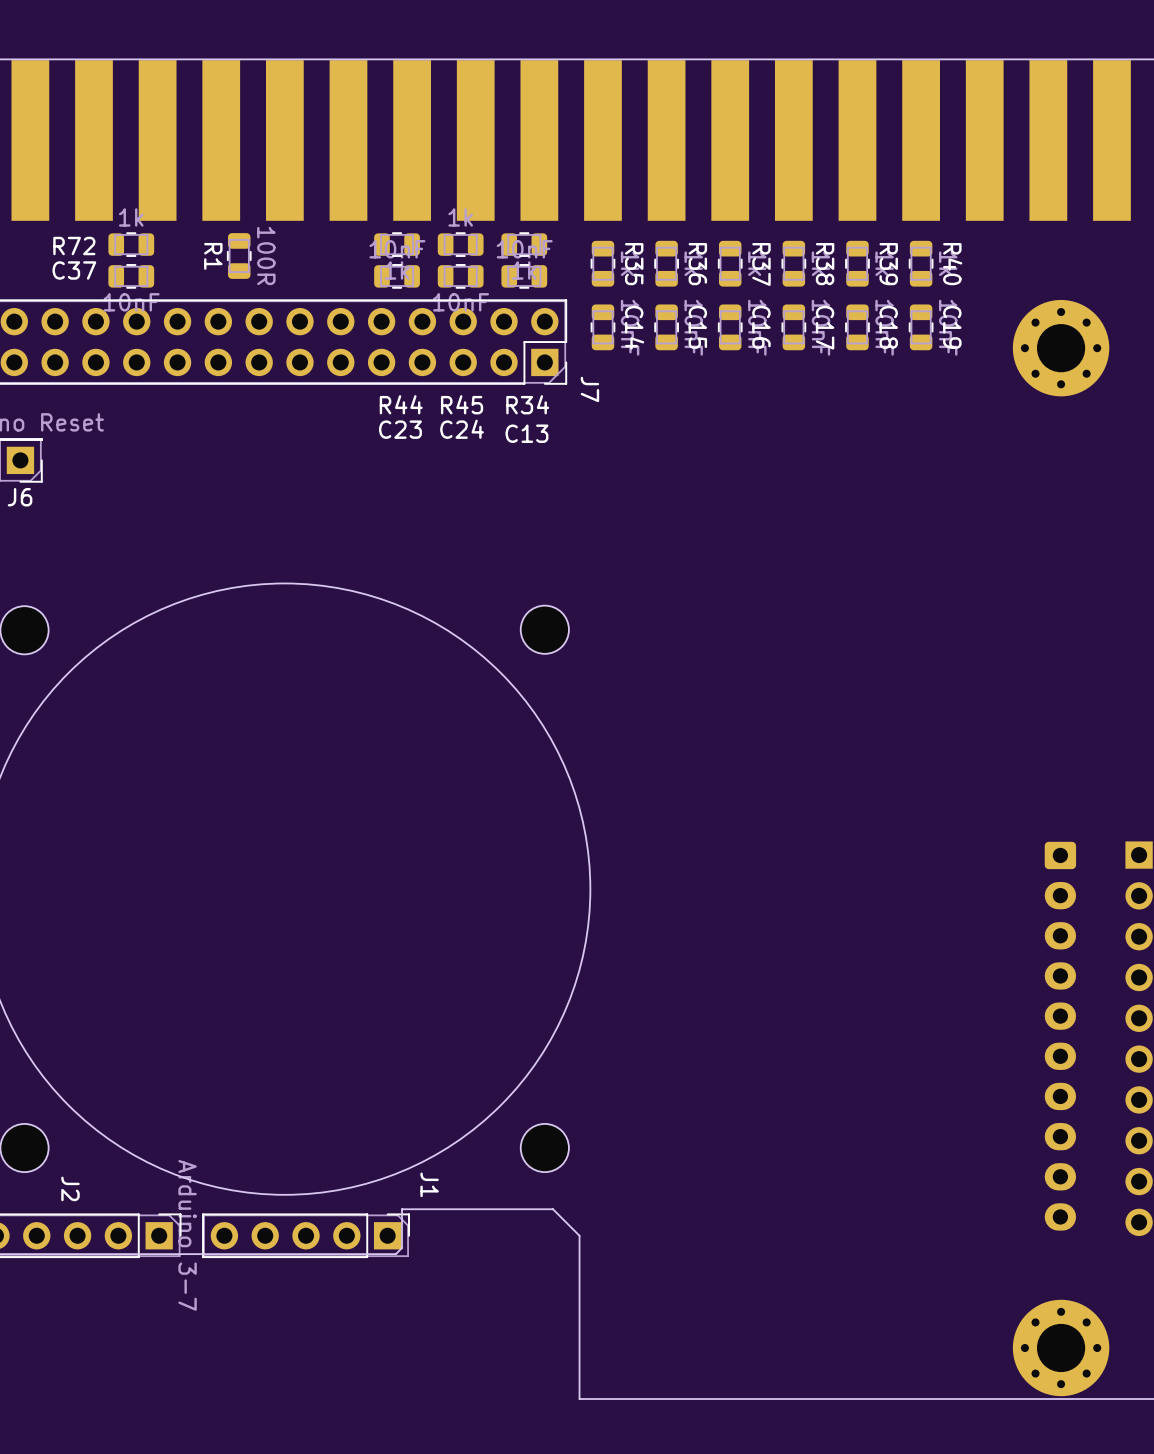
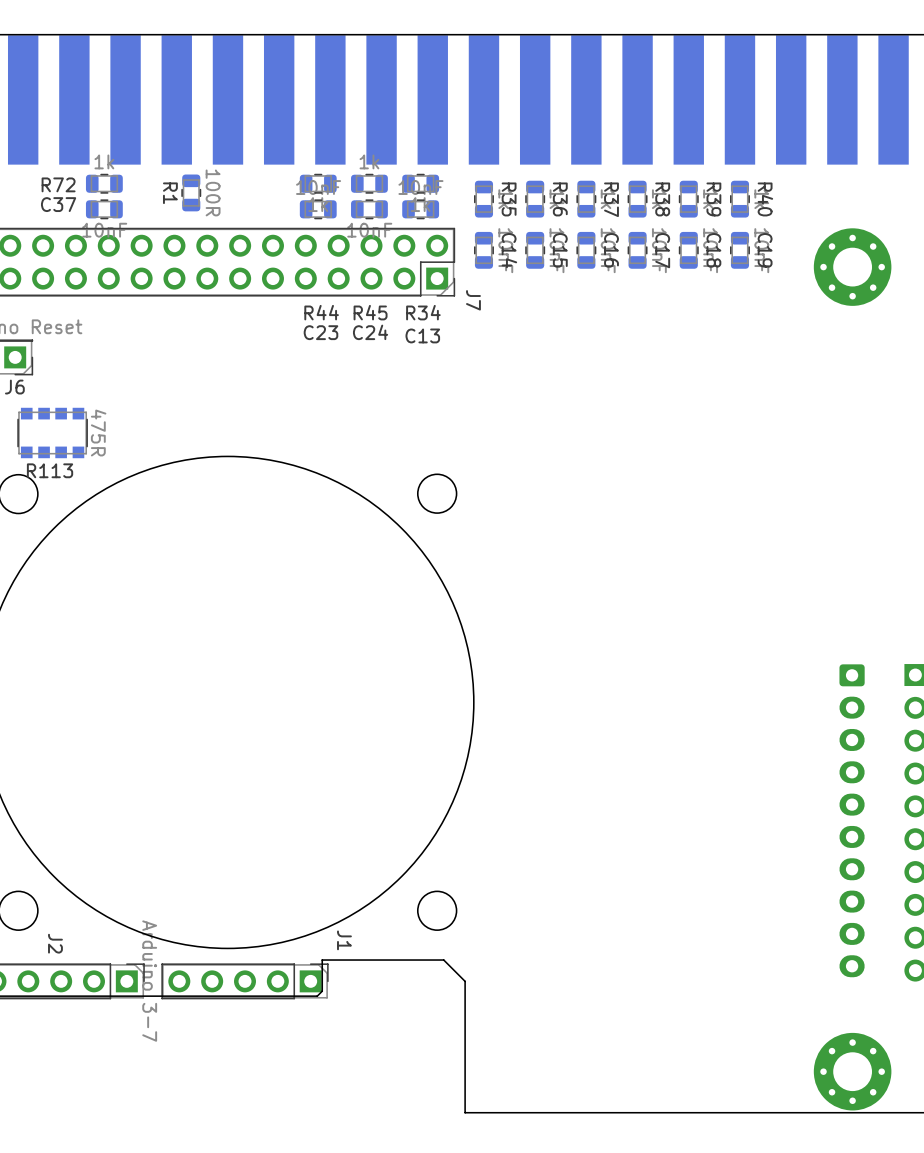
R113: none -> 475R (52, 433)

